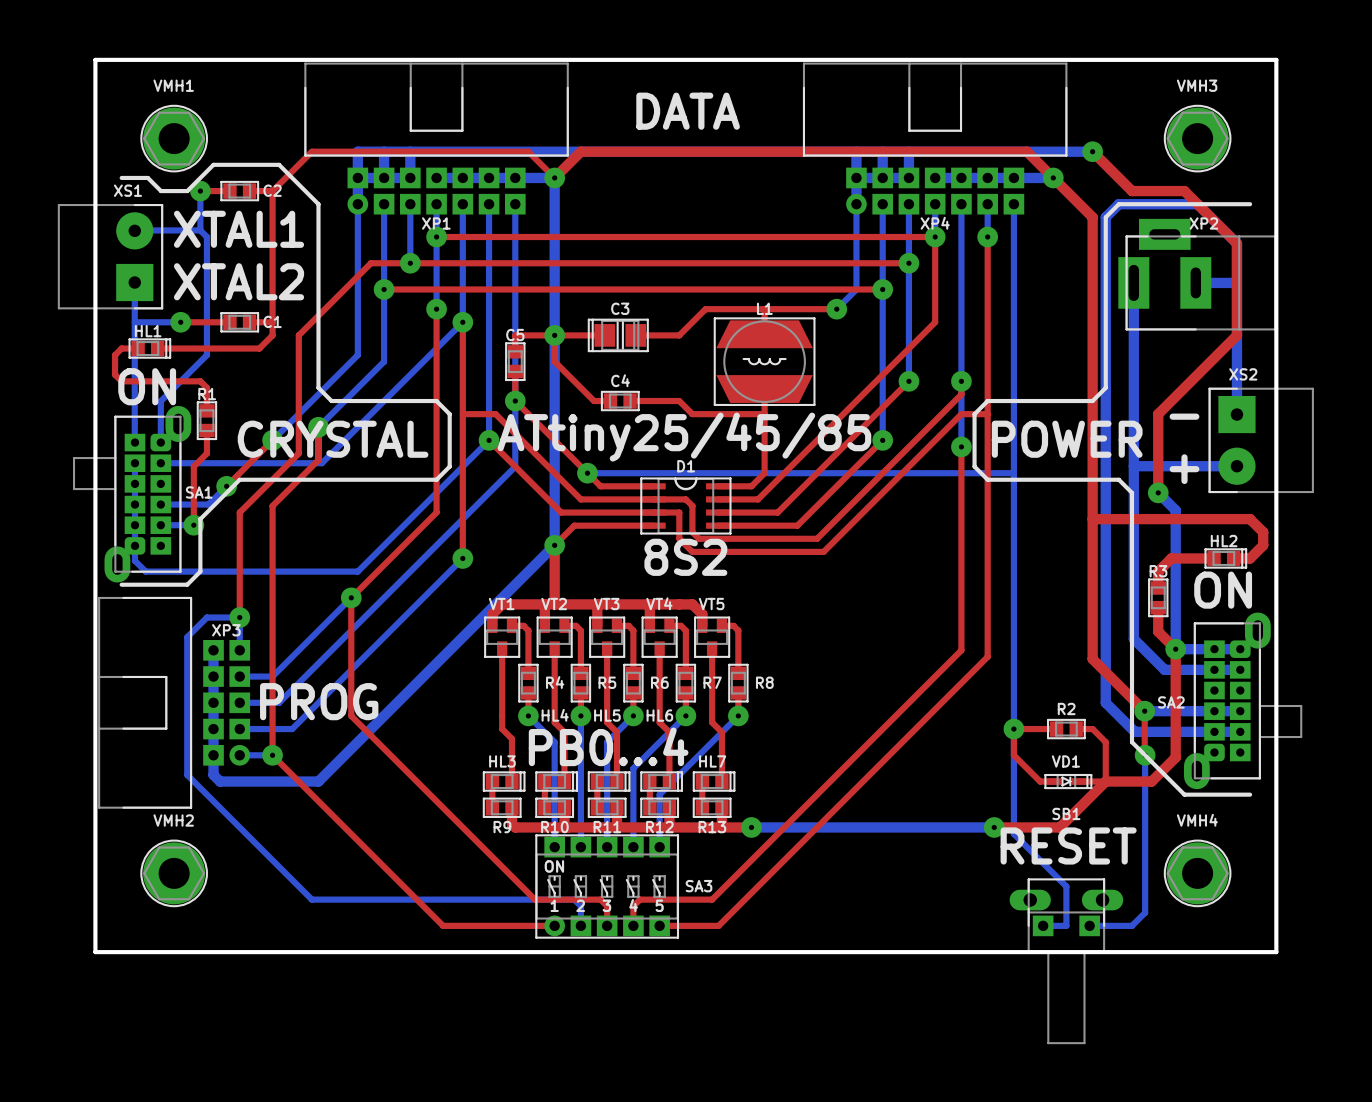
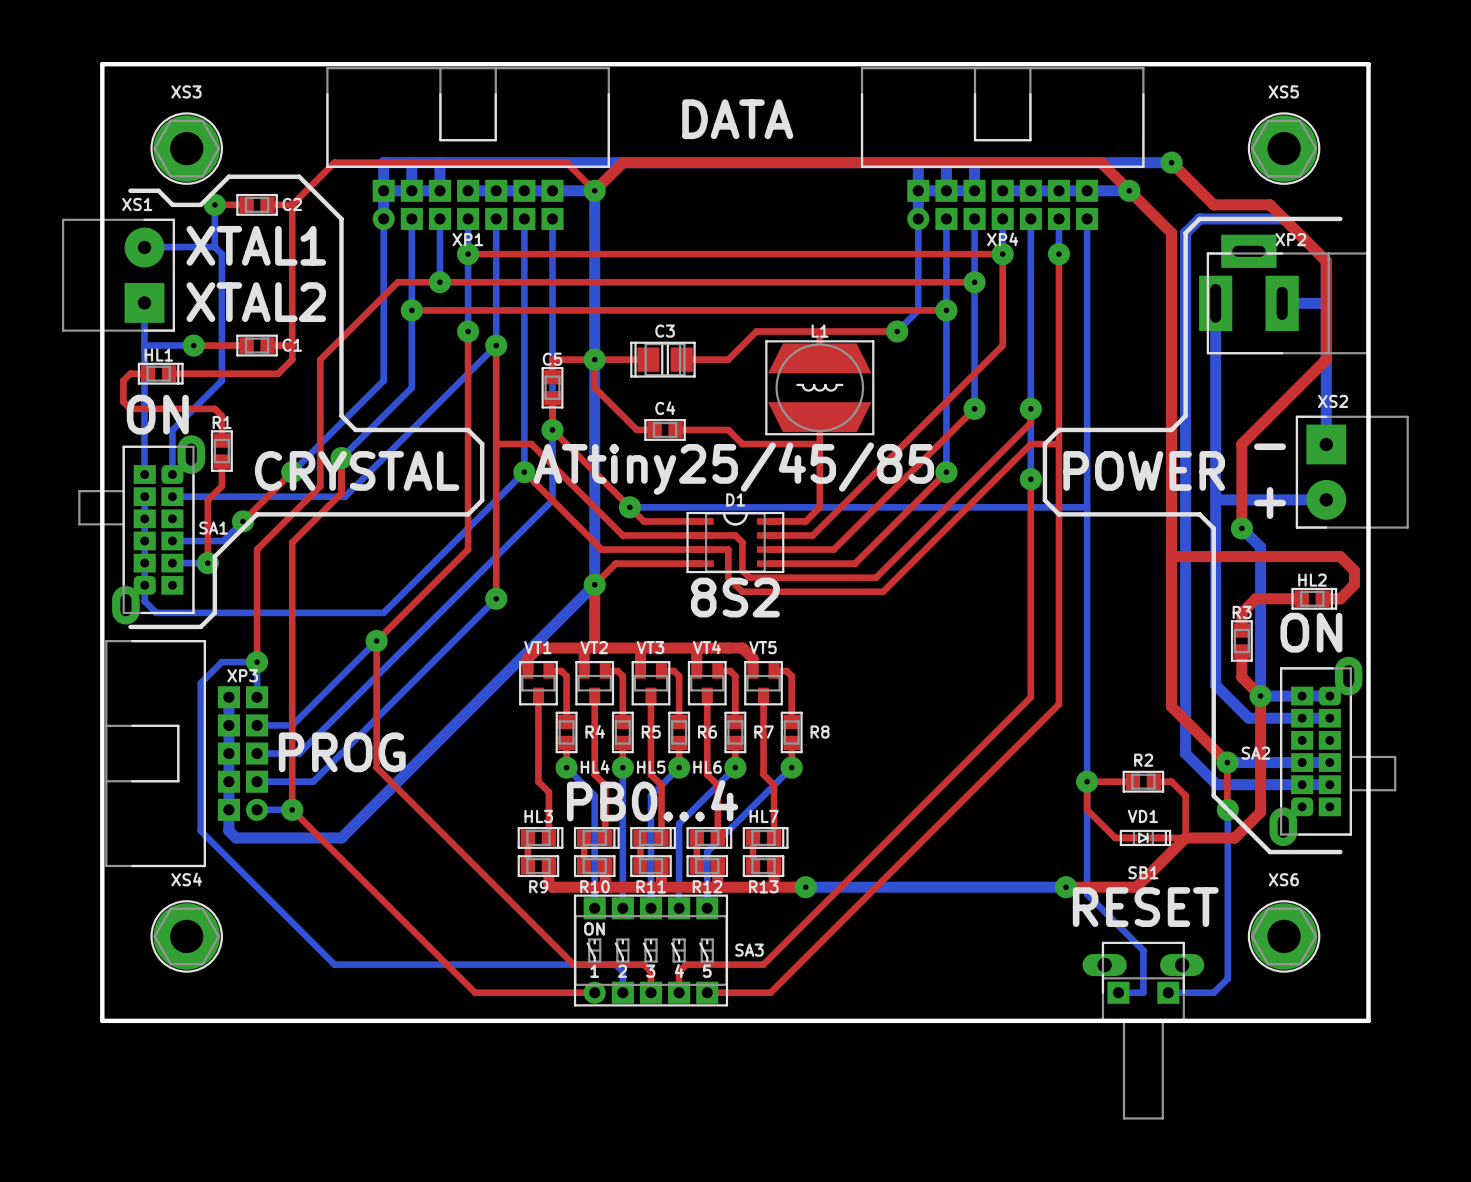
VMH1 name: VMH1 (173, 85) -> XS3 (186, 91)
VMH3 name: VMH3 (1197, 85) -> XS5 (1283, 91)
VMH2 name: VMH2 (173, 820) -> XS4 (186, 879)
VMH4 name: VMH4 (1197, 820) -> XS6 (1283, 879)

